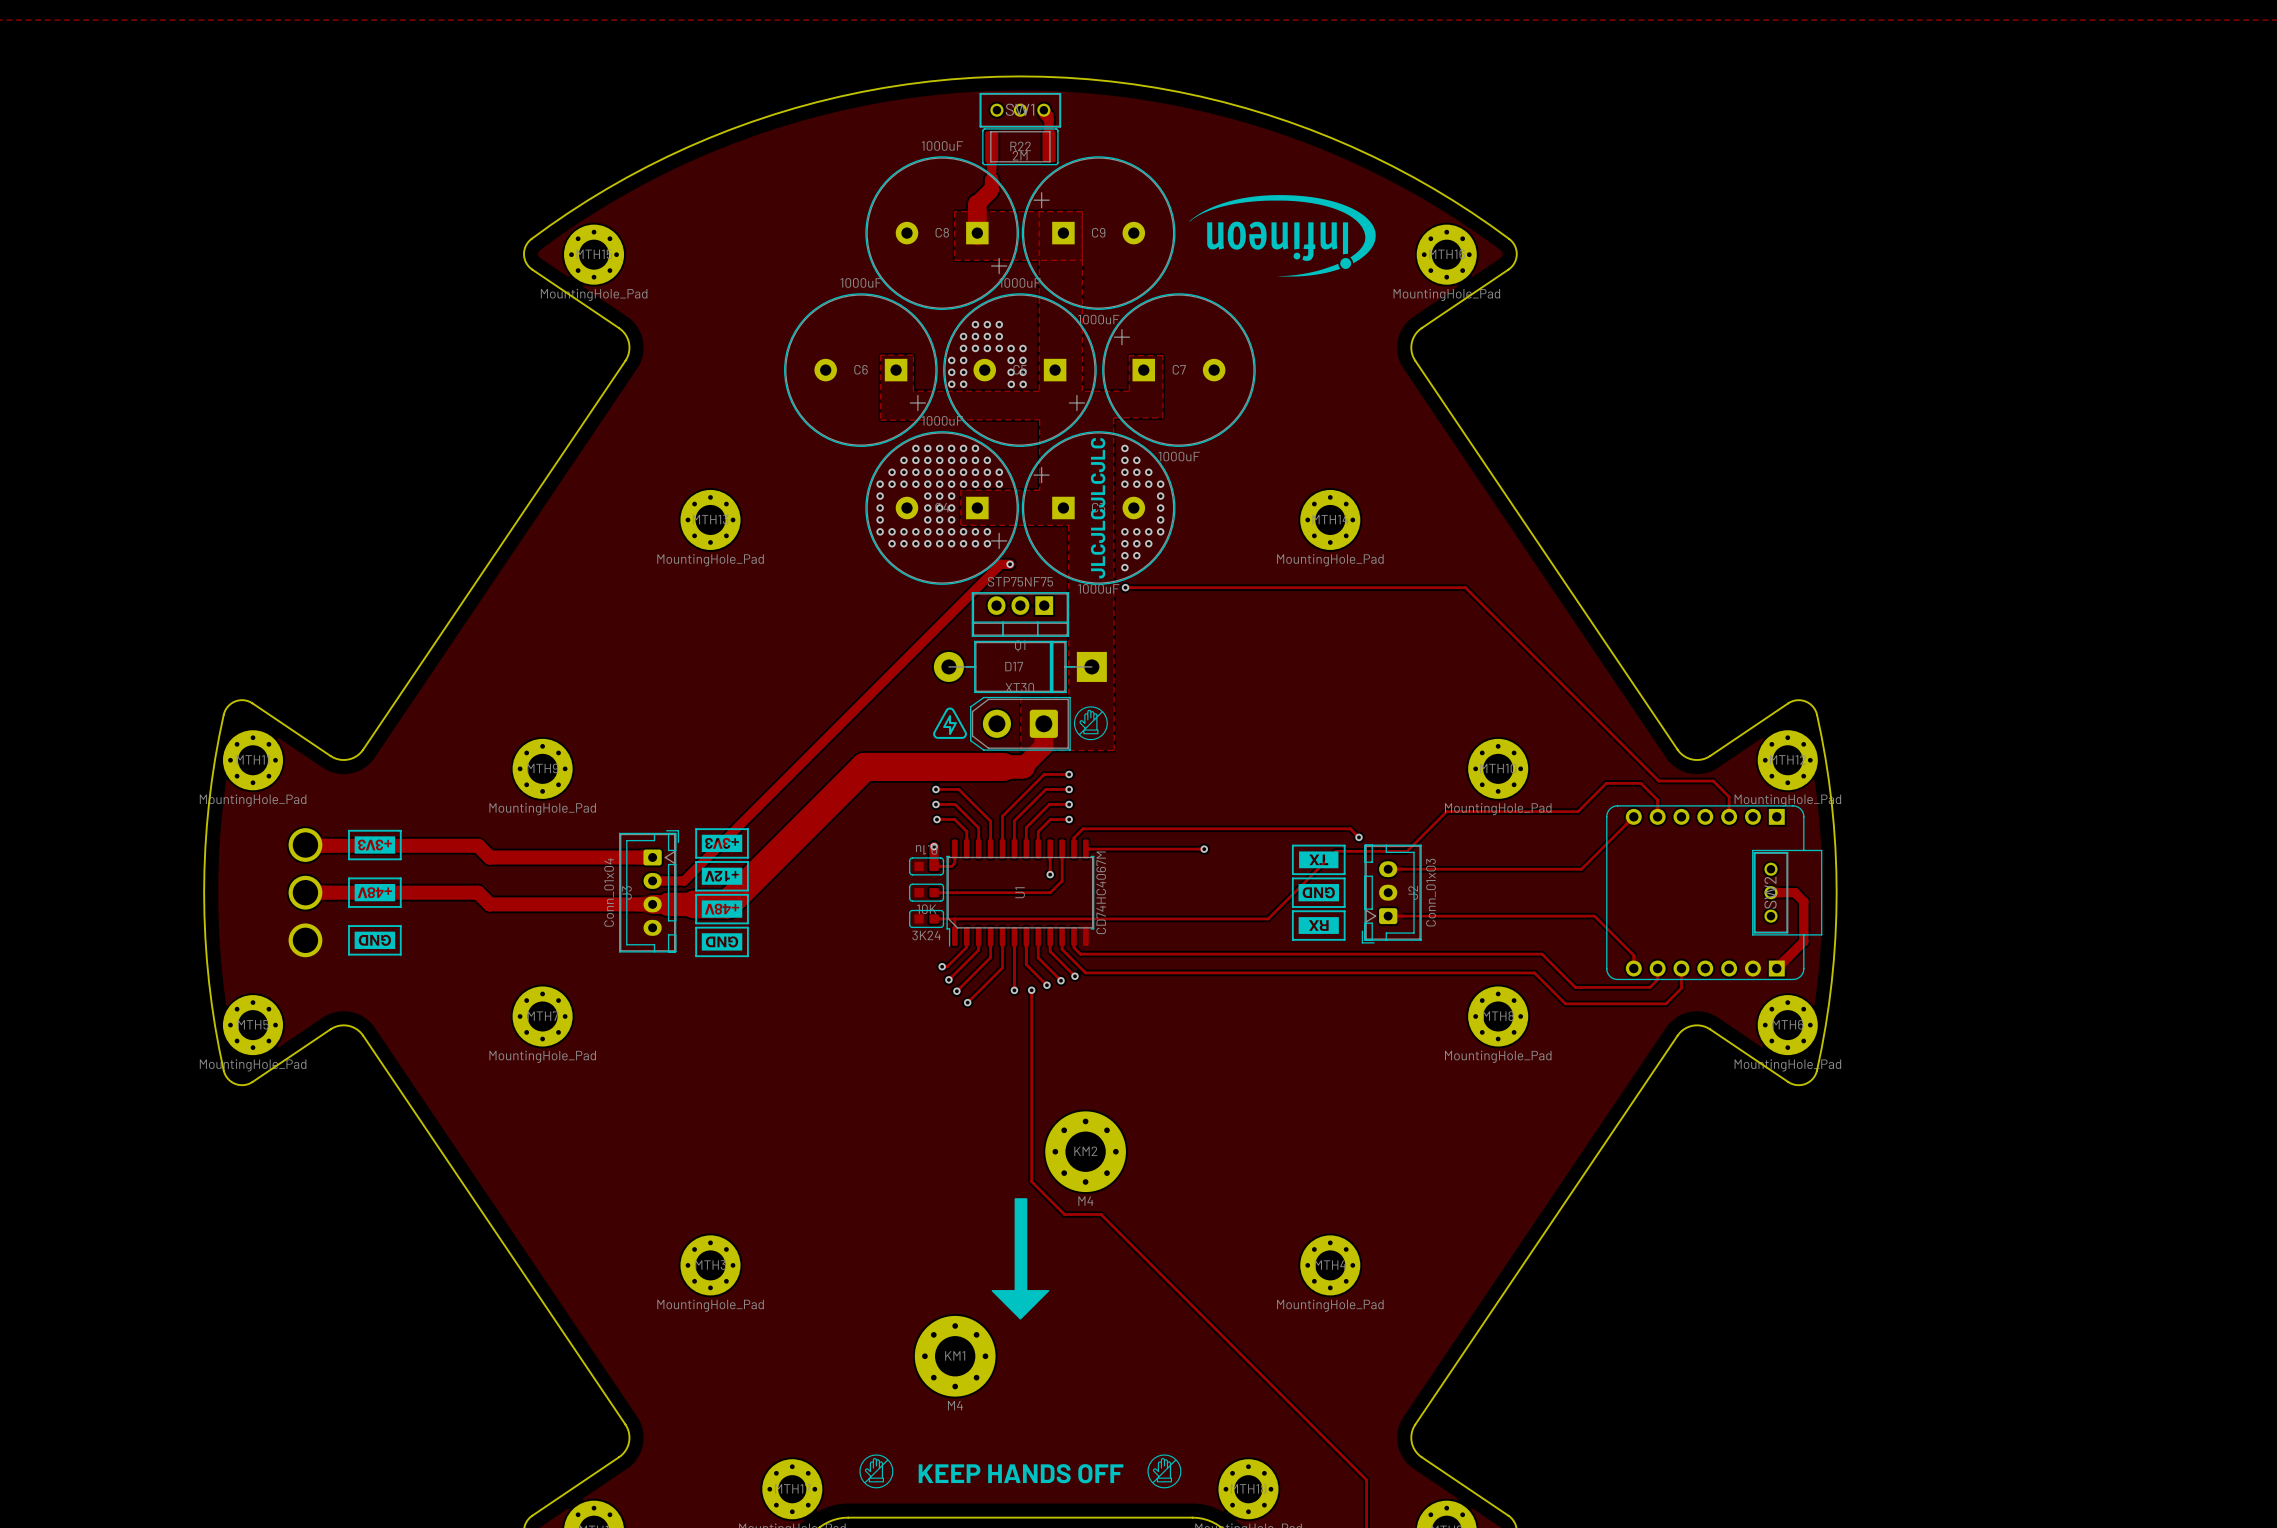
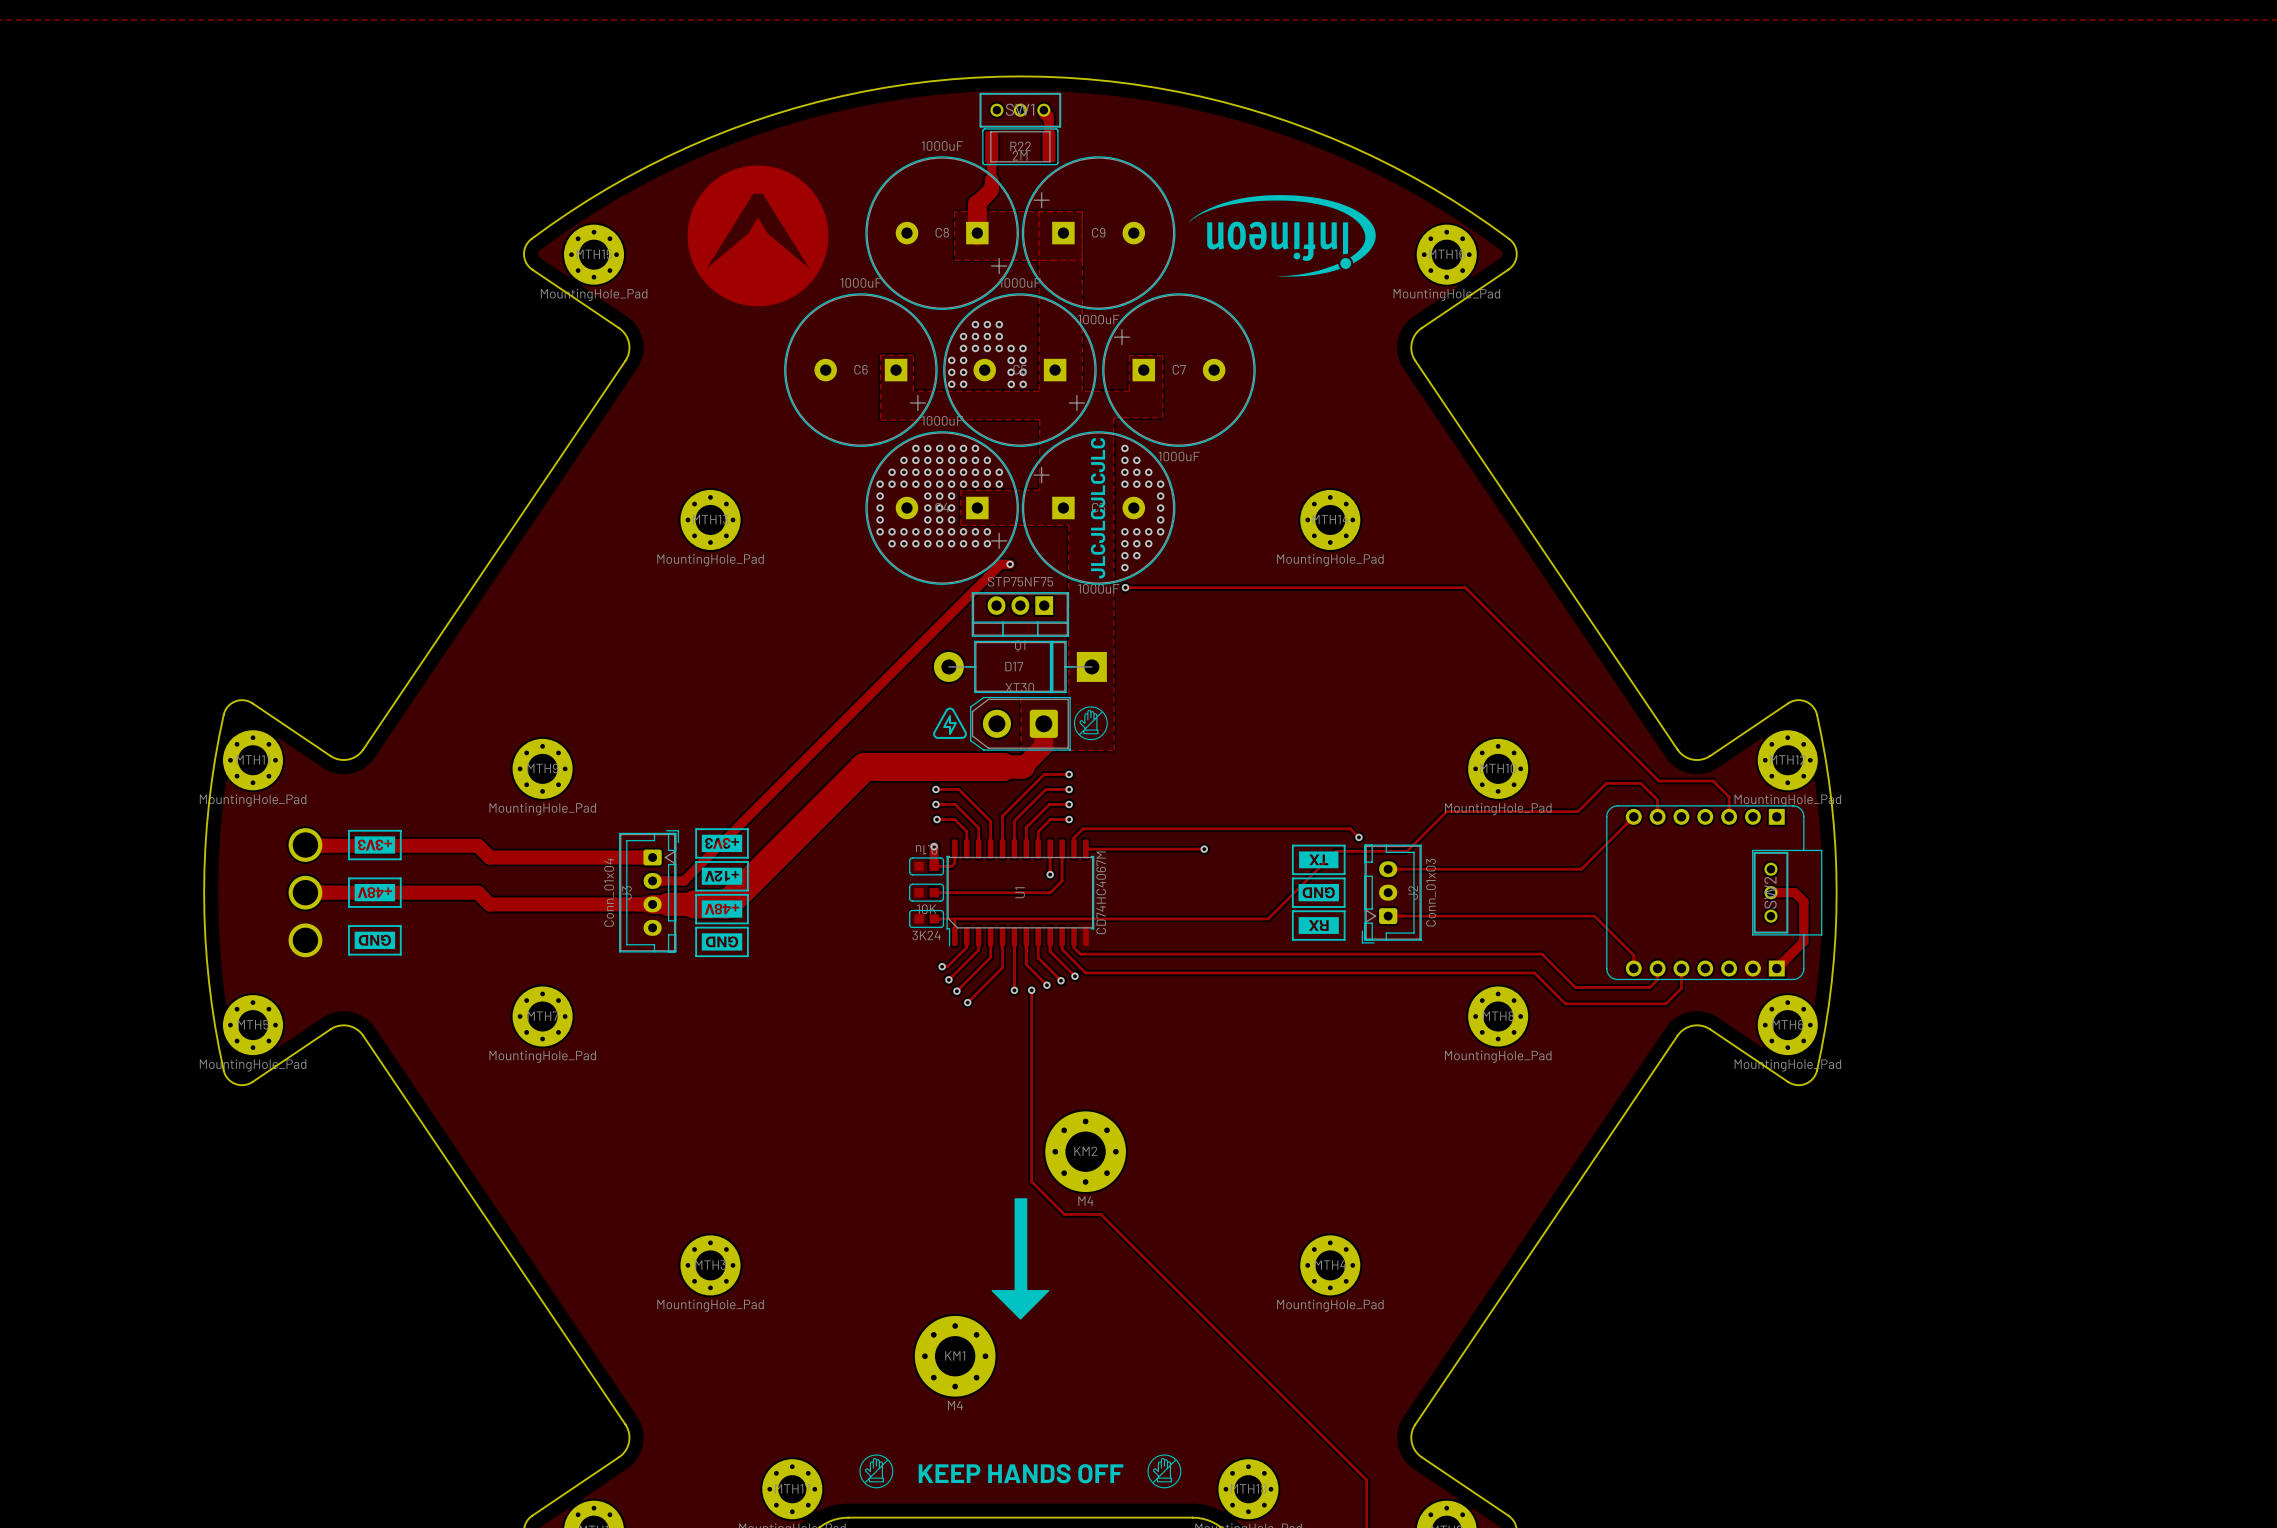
part: none -> (758, 235)

